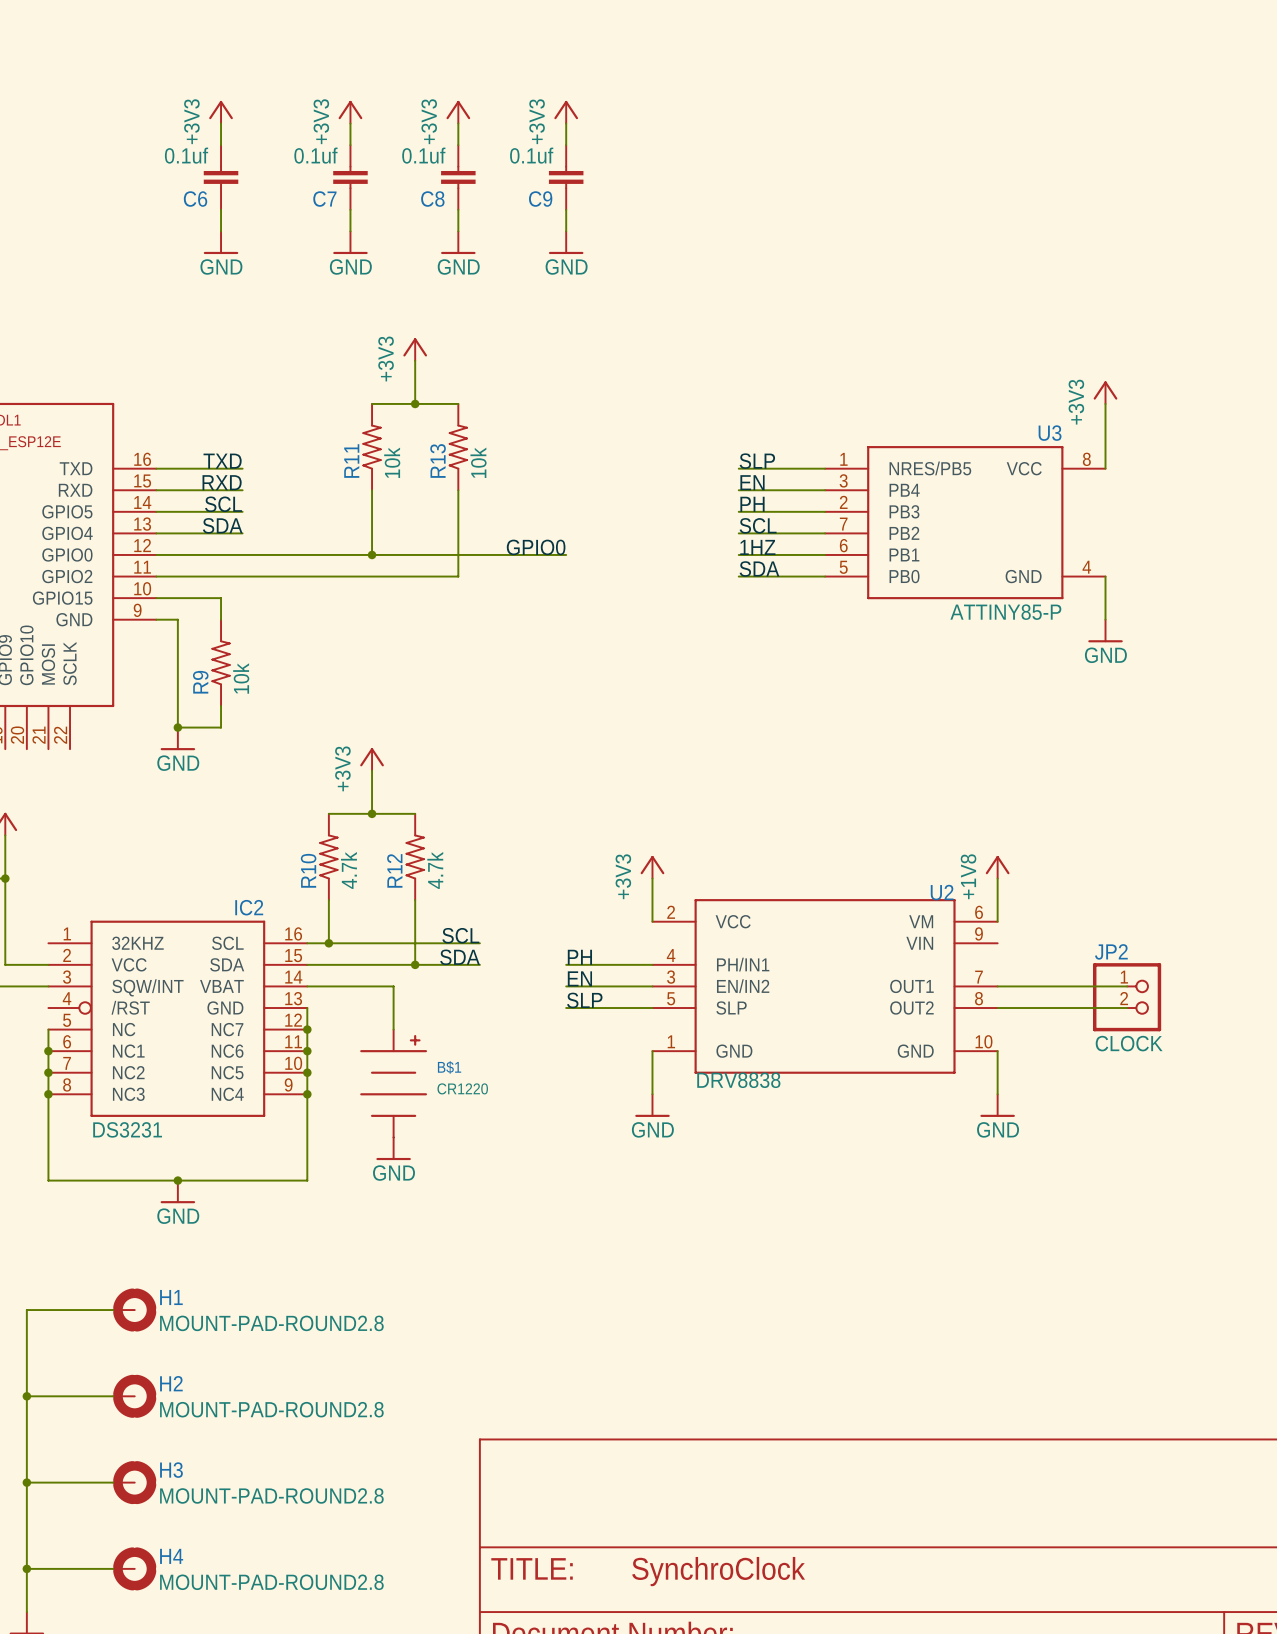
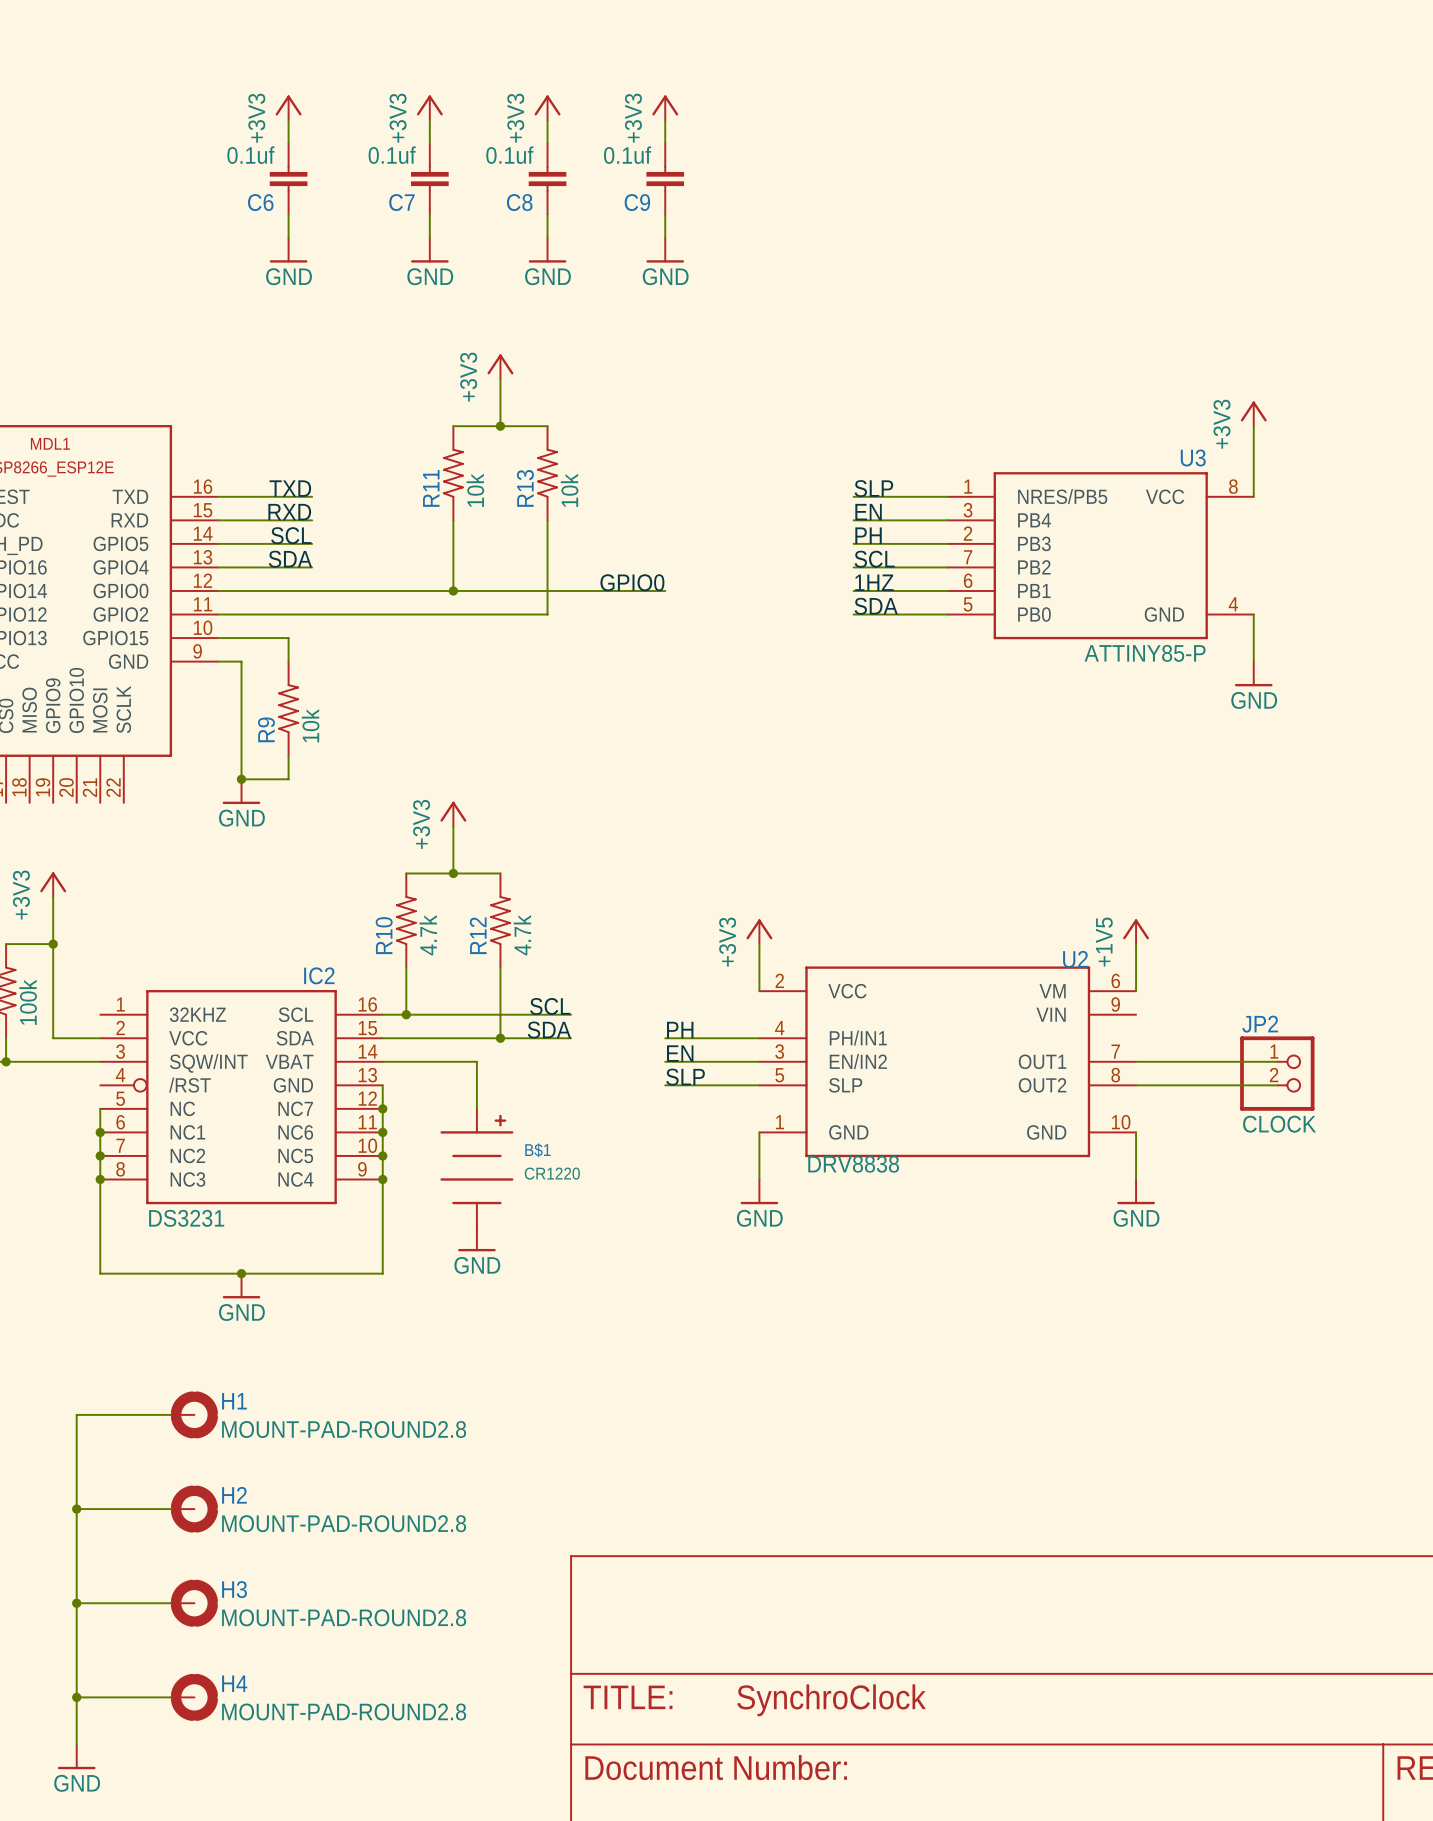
power symbol: +1V8 (997, 867) -> +1V5 (1136, 931)

